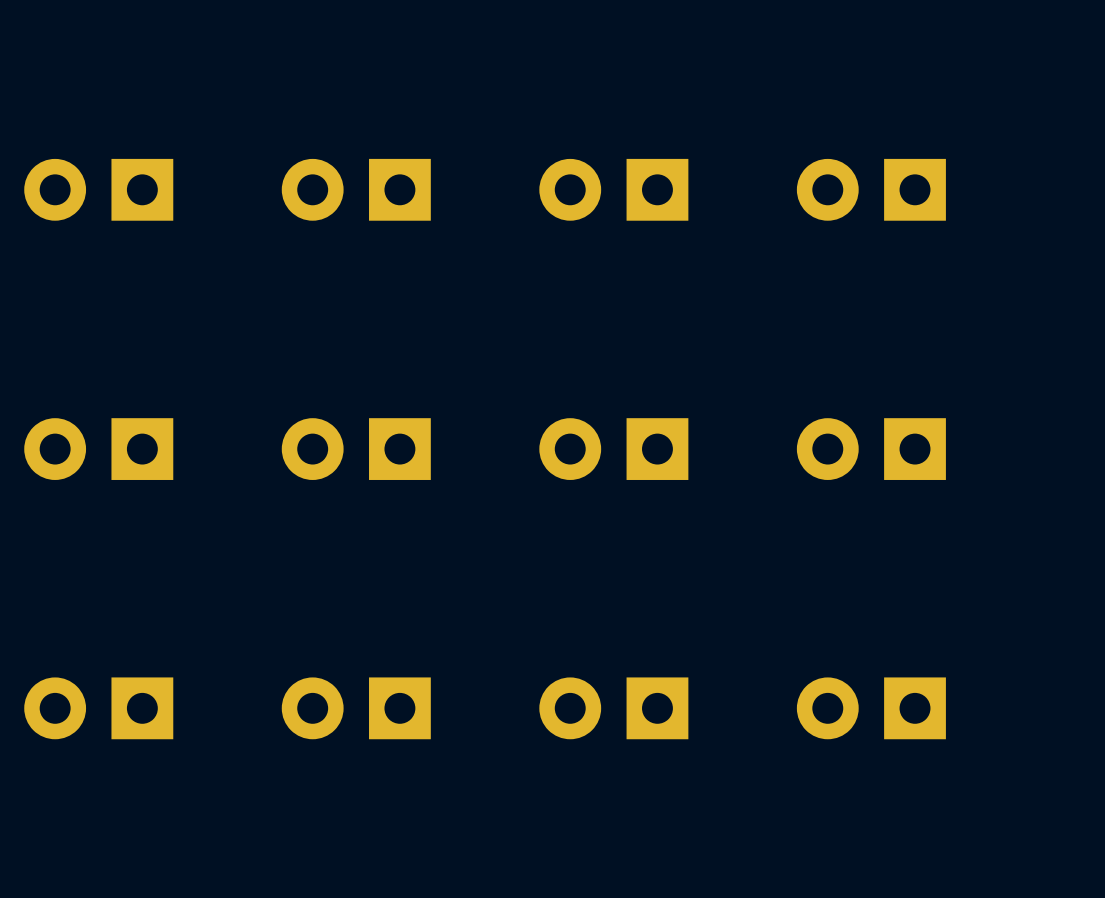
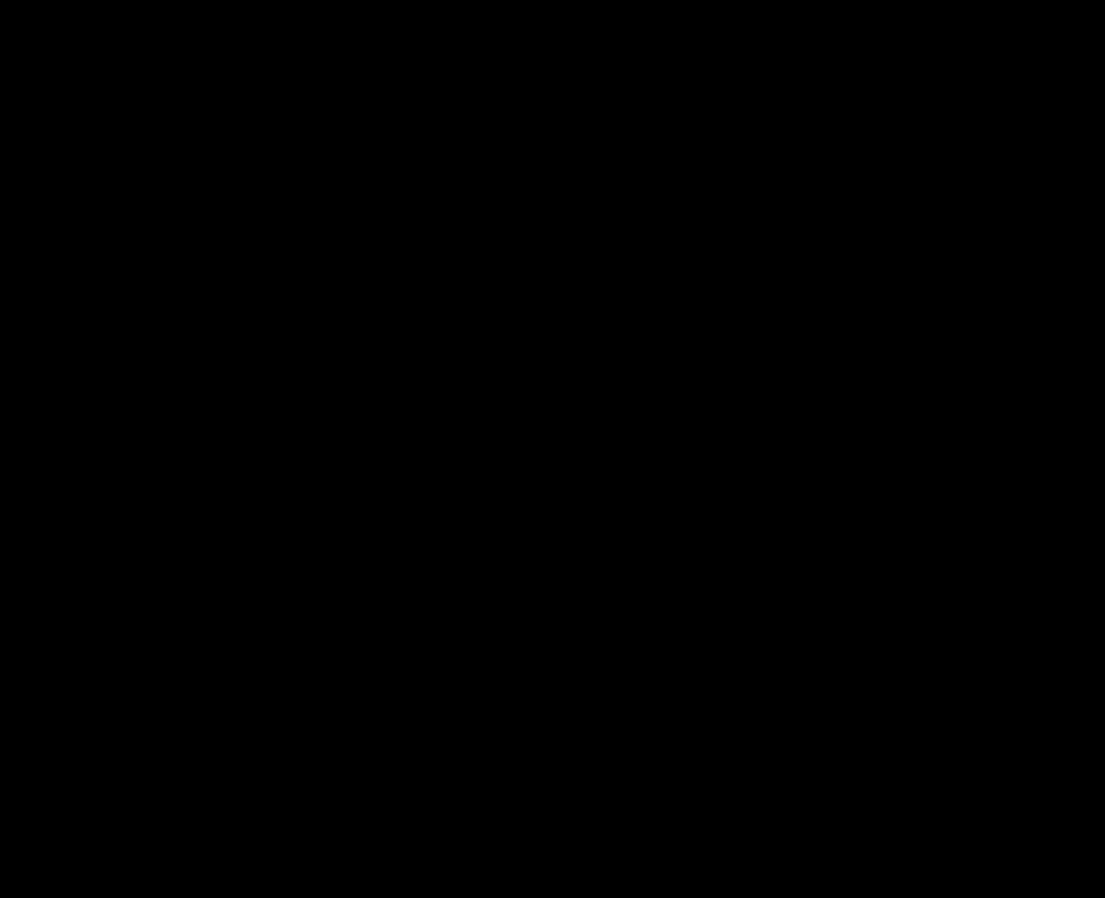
part: (98, 189) -> none
part: (356, 189) -> none
part: (613, 189) -> none
part: (871, 189) -> none
part: (98, 449) -> none
part: (356, 449) -> none
part: (613, 449) -> none
part: (871, 449) -> none
part: (98, 708) -> none
part: (356, 708) -> none
part: (613, 708) -> none
part: (871, 708) -> none

